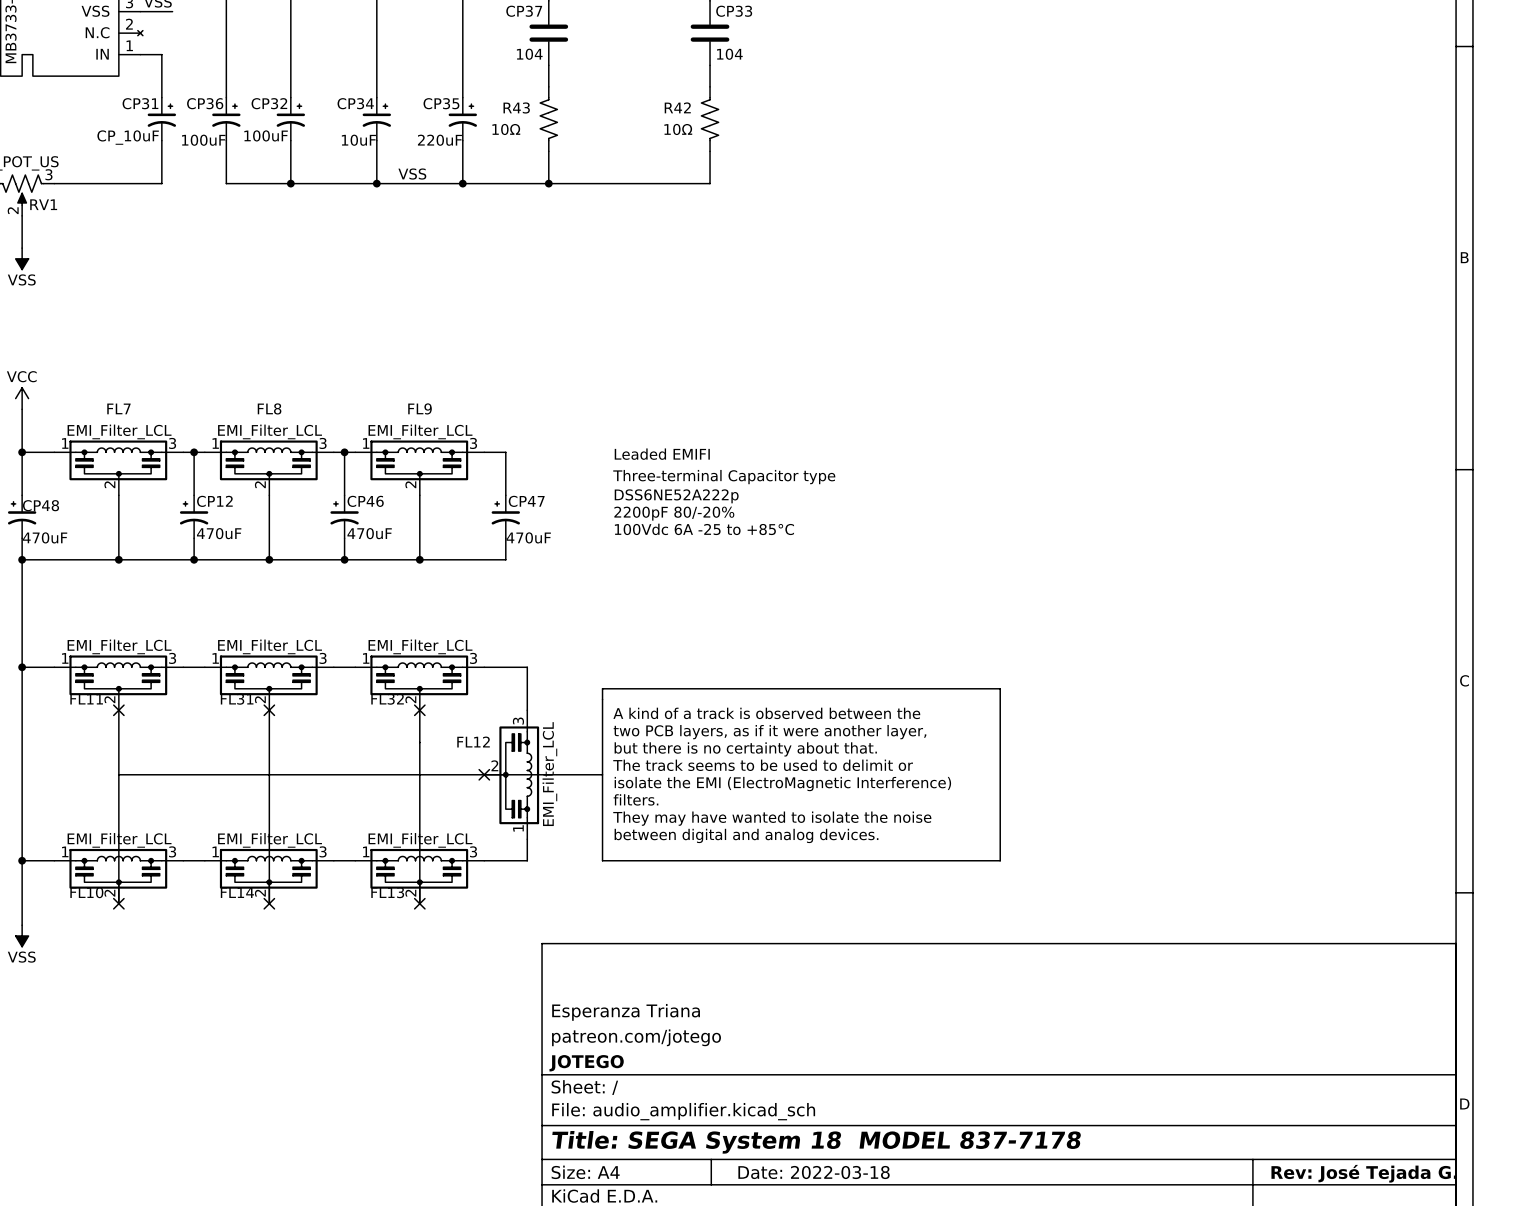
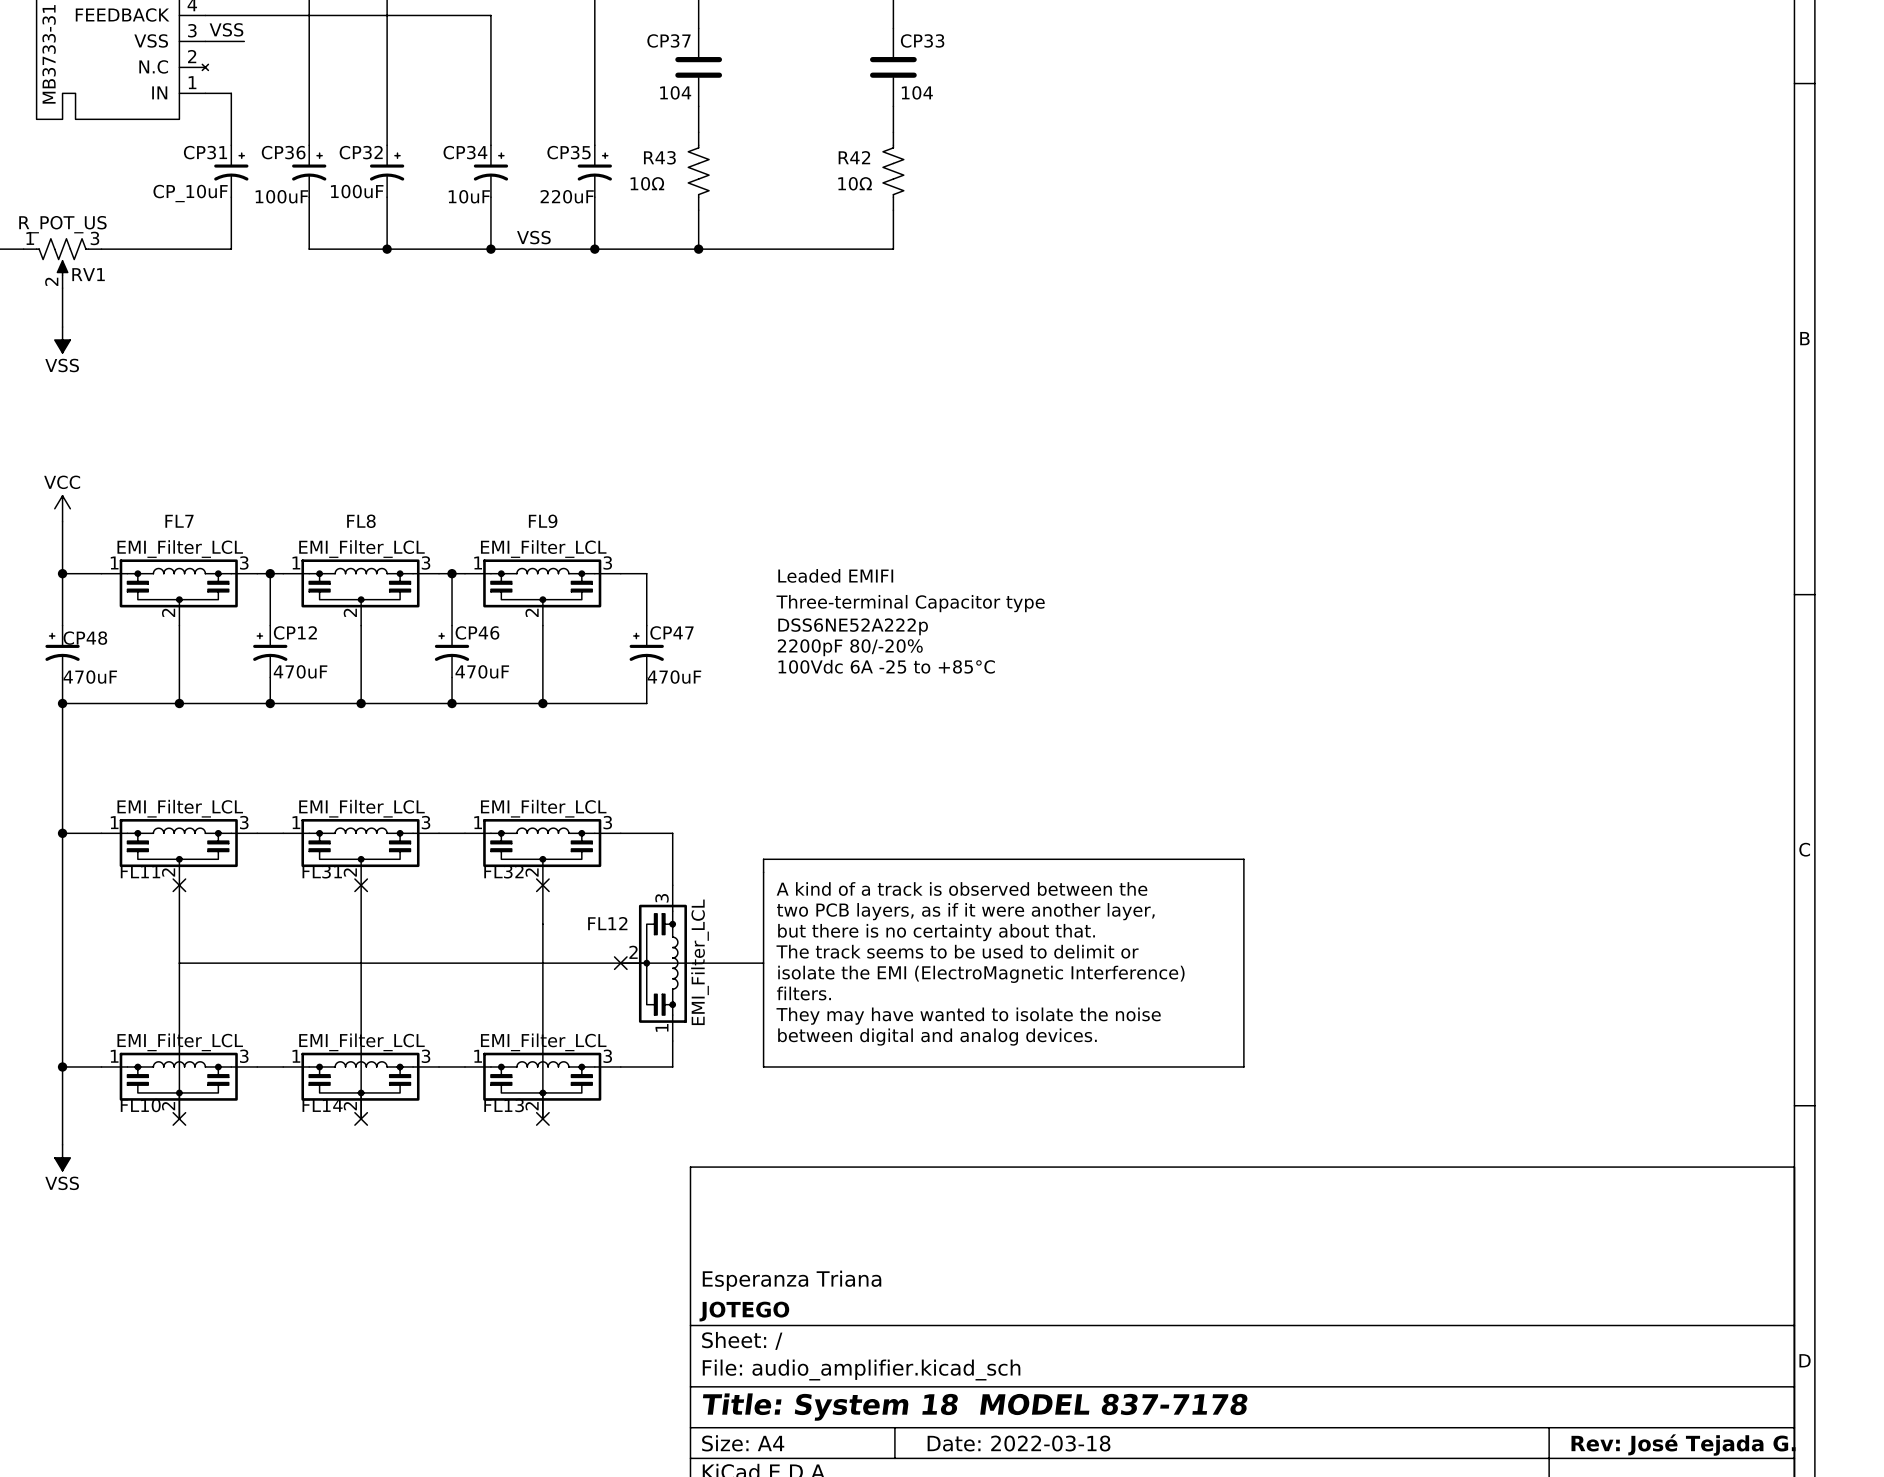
title block: Esperanza Triana (626, 1012) -> none
title block: patreon.com/jotego (636, 1037) -> Esperanza Triana (792, 1280)
title block: Title: SEGA System 18 MODEL 837-7178 (816, 1142) -> Title: System 18 MODEL 837-7178 (975, 1407)

